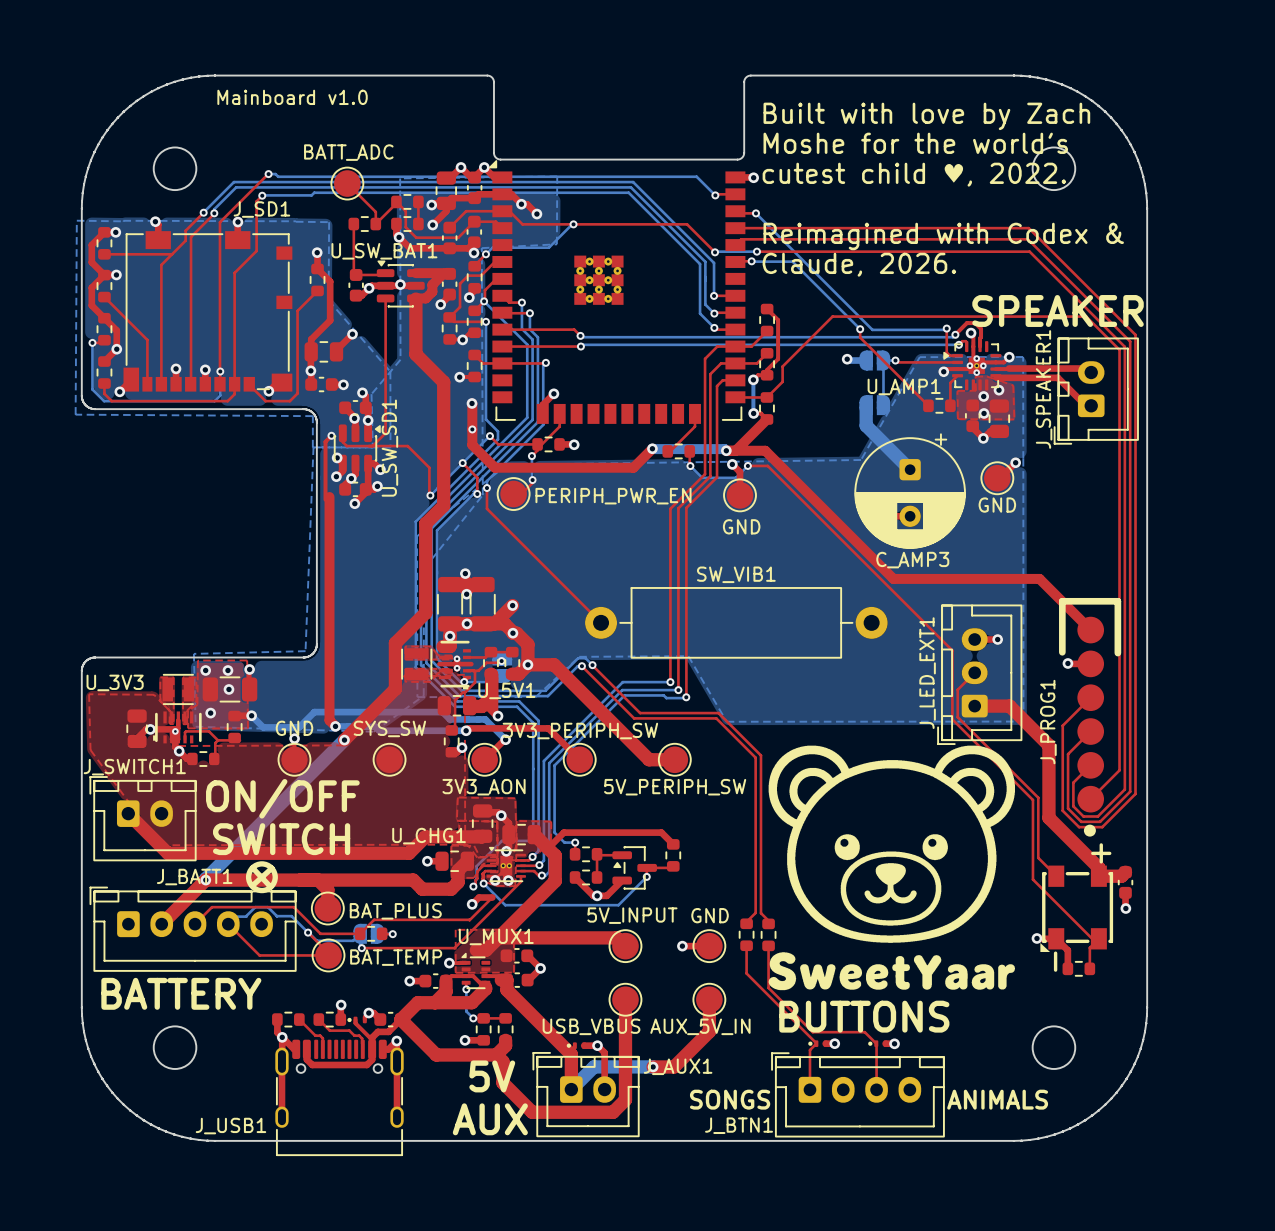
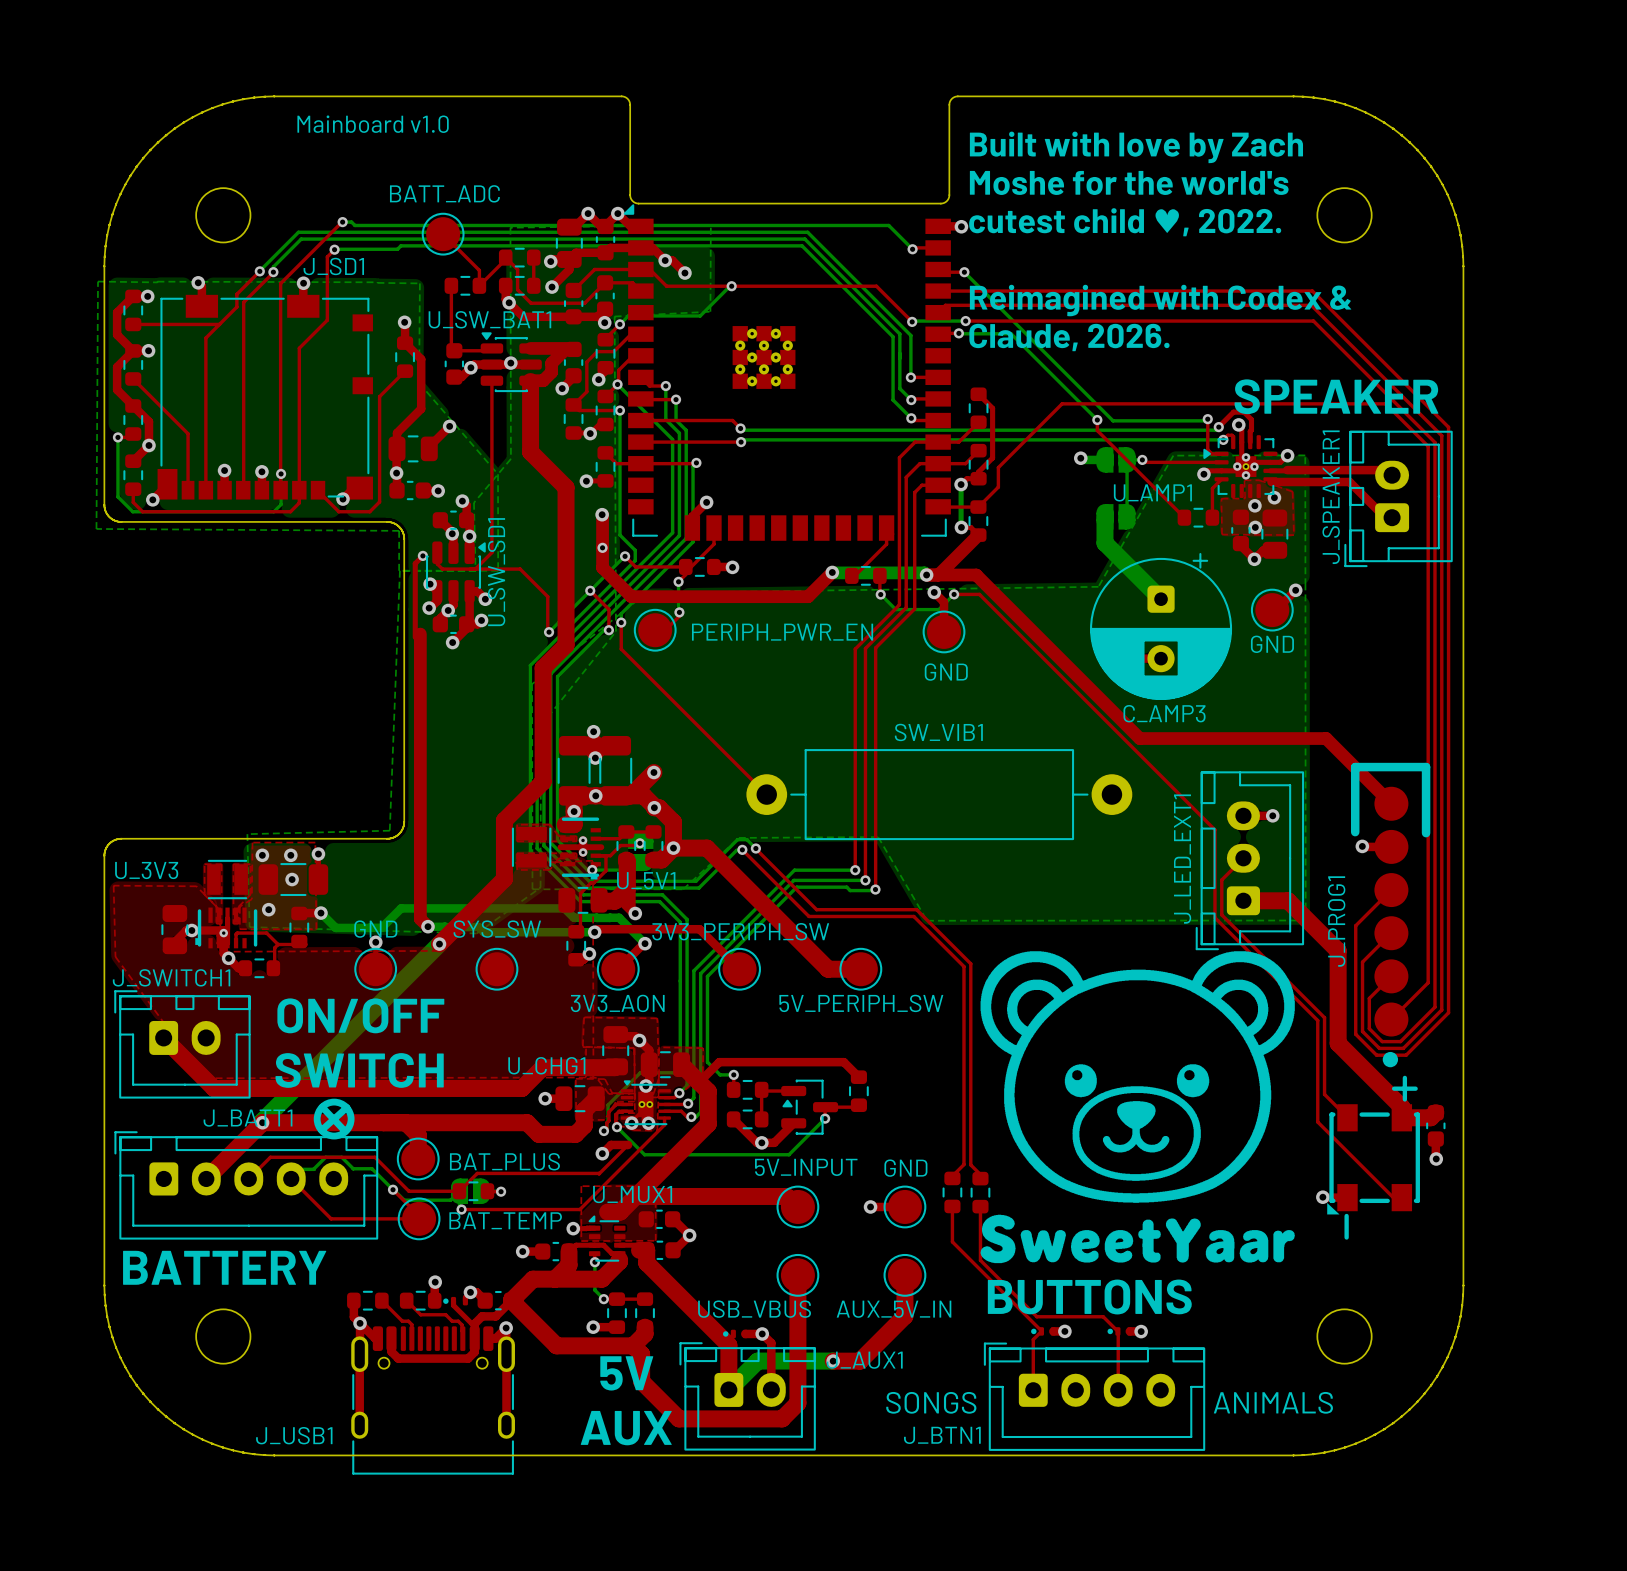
top track: (1056, 938) (1067, 950) (1067, 968) -> none
top track: (1098, 938) (1089, 947) (1089, 968) -> none
part: (1078, 968) -> none

